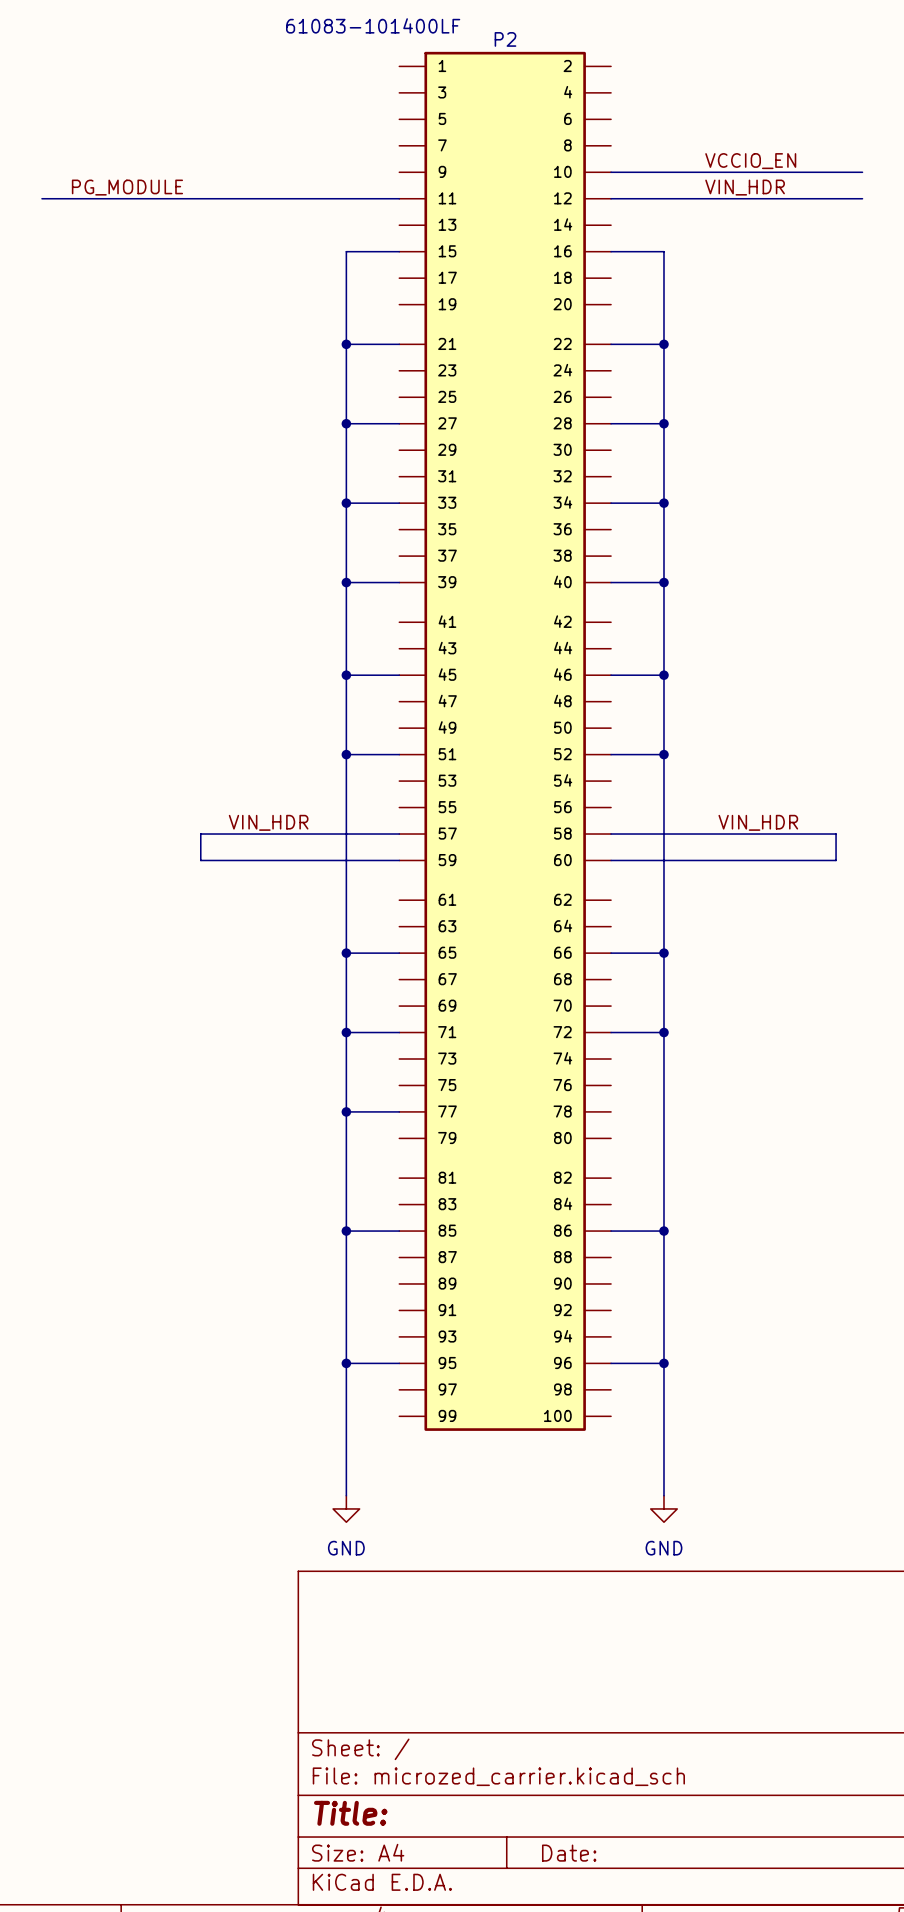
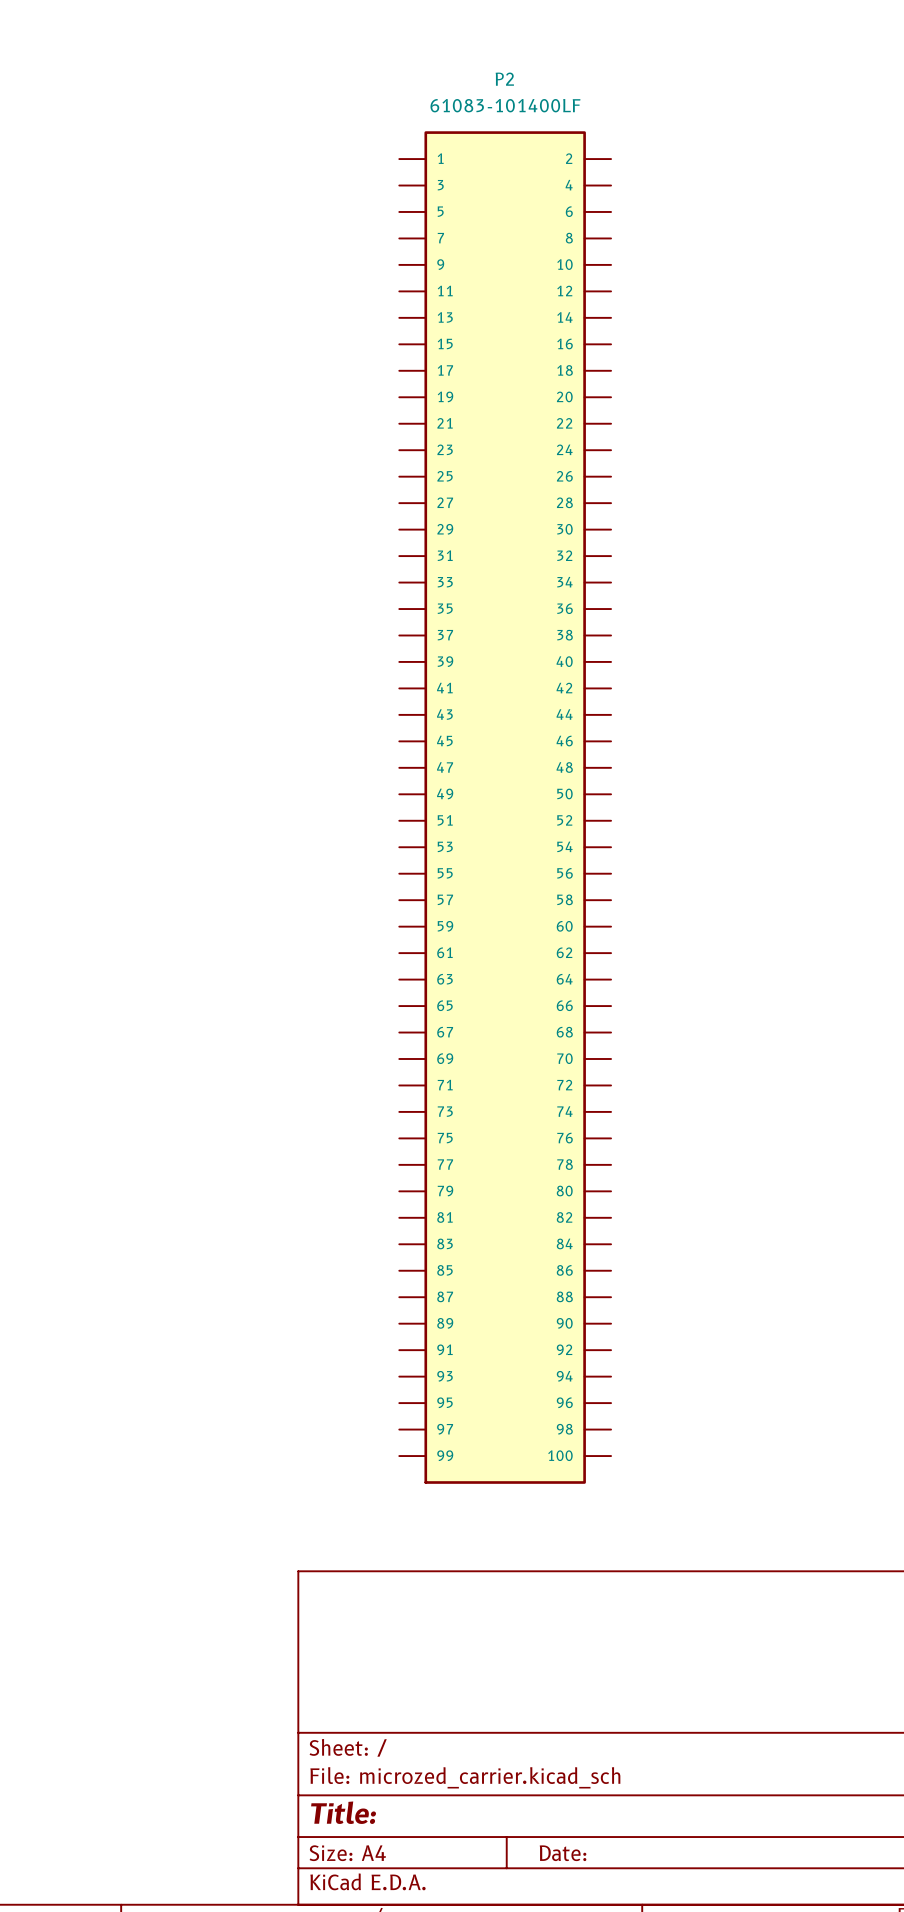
P2 value position: 61083-101400LF (373, 25) -> 61083-101400LF (505, 105)
P2 name position: P2 (505, 39) -> P2 (504, 79)
P2 symbol: [399, 51, 612, 1431] -> [399, 131, 612, 1484]
label: VCCIO_EN (750, 161) -> none
wire: (611, 172) (862, 172) -> none
label: PG_MODULE (127, 187) -> none
label: VIN_HDR (745, 187) -> none
wire: (41, 198) (399, 198) -> none
wire: (611, 198) (862, 198) -> none
wire: (399, 251) (346, 251) (346, 1495) -> none
wire: (611, 251) (663, 251) (663, 1495) -> none
wire: (346, 344) (399, 344) -> none
junction: (346, 344) -> none
wire: (611, 344) (663, 344) -> none
junction: (663, 344) -> none
wire: (346, 423) (399, 423) -> none
junction: (346, 423) -> none
wire: (611, 423) (663, 423) -> none
junction: (663, 423) -> none
wire: (346, 503) (399, 503) -> none
junction: (346, 503) -> none
wire: (611, 503) (663, 503) -> none
junction: (663, 503) -> none
wire: (346, 582) (399, 582) -> none
junction: (346, 582) -> none
wire: (611, 582) (663, 582) -> none
junction: (663, 582) -> none
wire: (346, 675) (399, 675) -> none
junction: (346, 675) -> none
wire: (611, 675) (663, 675) -> none
junction: (663, 675) -> none
wire: (346, 754) (399, 754) -> none
junction: (346, 754) -> none
wire: (611, 754) (663, 754) -> none
junction: (663, 754) -> none
label: VIN_HDR (268, 822) -> none
label: VIN_HDR (758, 822) -> none
wire: (399, 834) (200, 834) (200, 860) (399, 860) -> none
wire: (611, 834) (836, 834) (836, 860) (611, 860) -> none
wire: (346, 953) (399, 953) -> none
junction: (346, 953) -> none
wire: (611, 953) (663, 953) -> none
junction: (663, 953) -> none
wire: (346, 1032) (399, 1032) -> none
junction: (346, 1032) -> none
wire: (611, 1032) (663, 1032) -> none
junction: (663, 1032) -> none
wire: (346, 1111) (399, 1111) -> none
junction: (346, 1111) -> none
wire: (346, 1231) (399, 1231) -> none
junction: (346, 1231) -> none
wire: (611, 1231) (663, 1231) -> none
junction: (663, 1231) -> none
wire: (346, 1363) (399, 1363) -> none
junction: (346, 1363) -> none
wire: (611, 1363) (663, 1363) -> none
junction: (663, 1363) -> none
power symbol: GND (346, 1508) -> none
power symbol: GND (663, 1508) -> none

